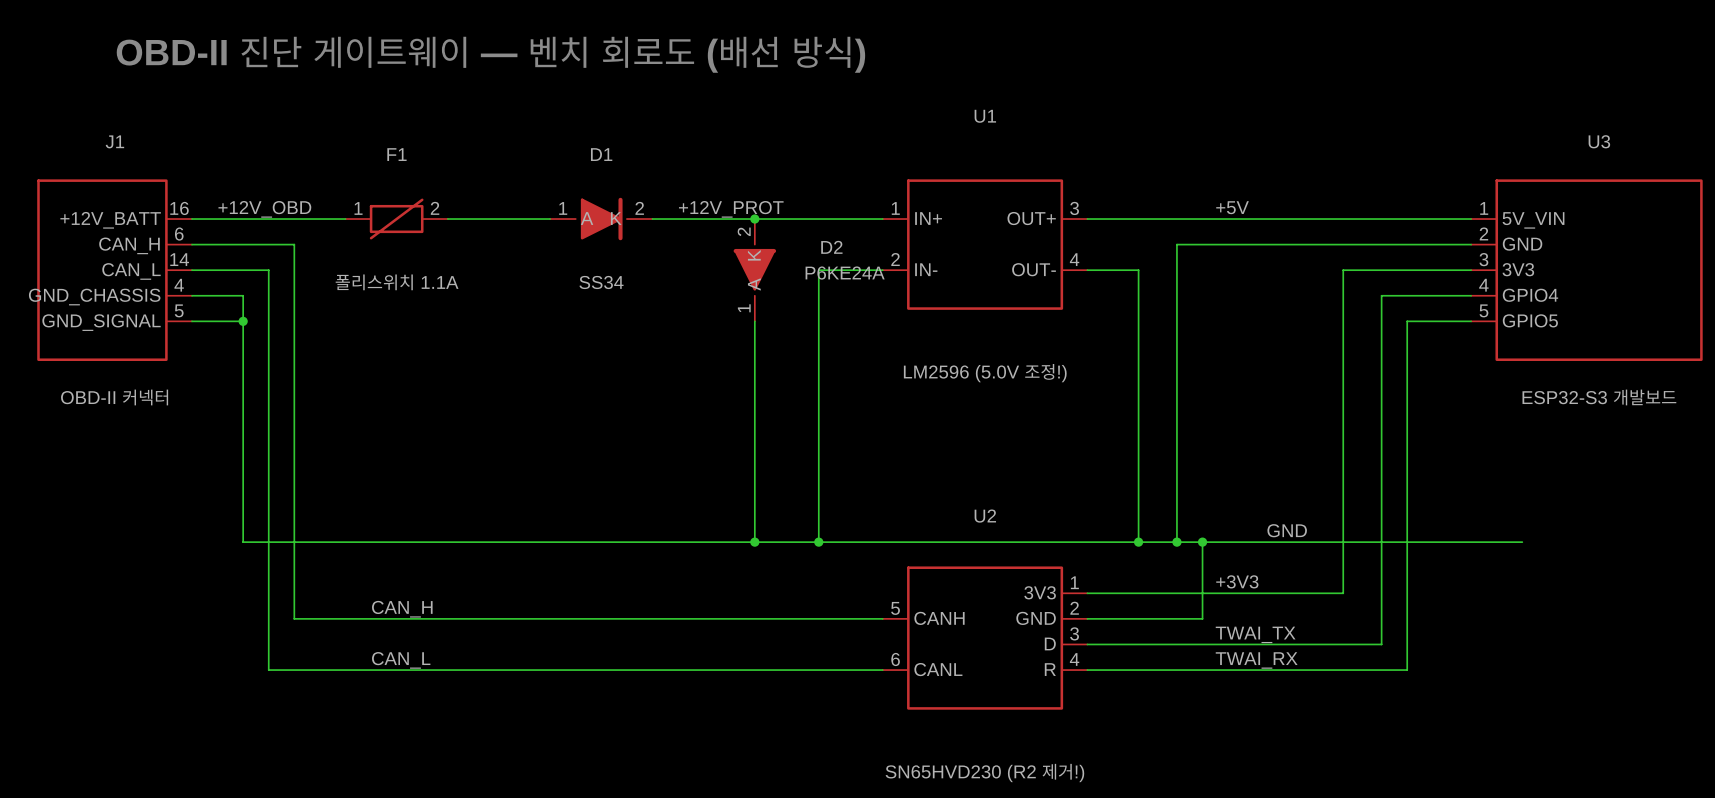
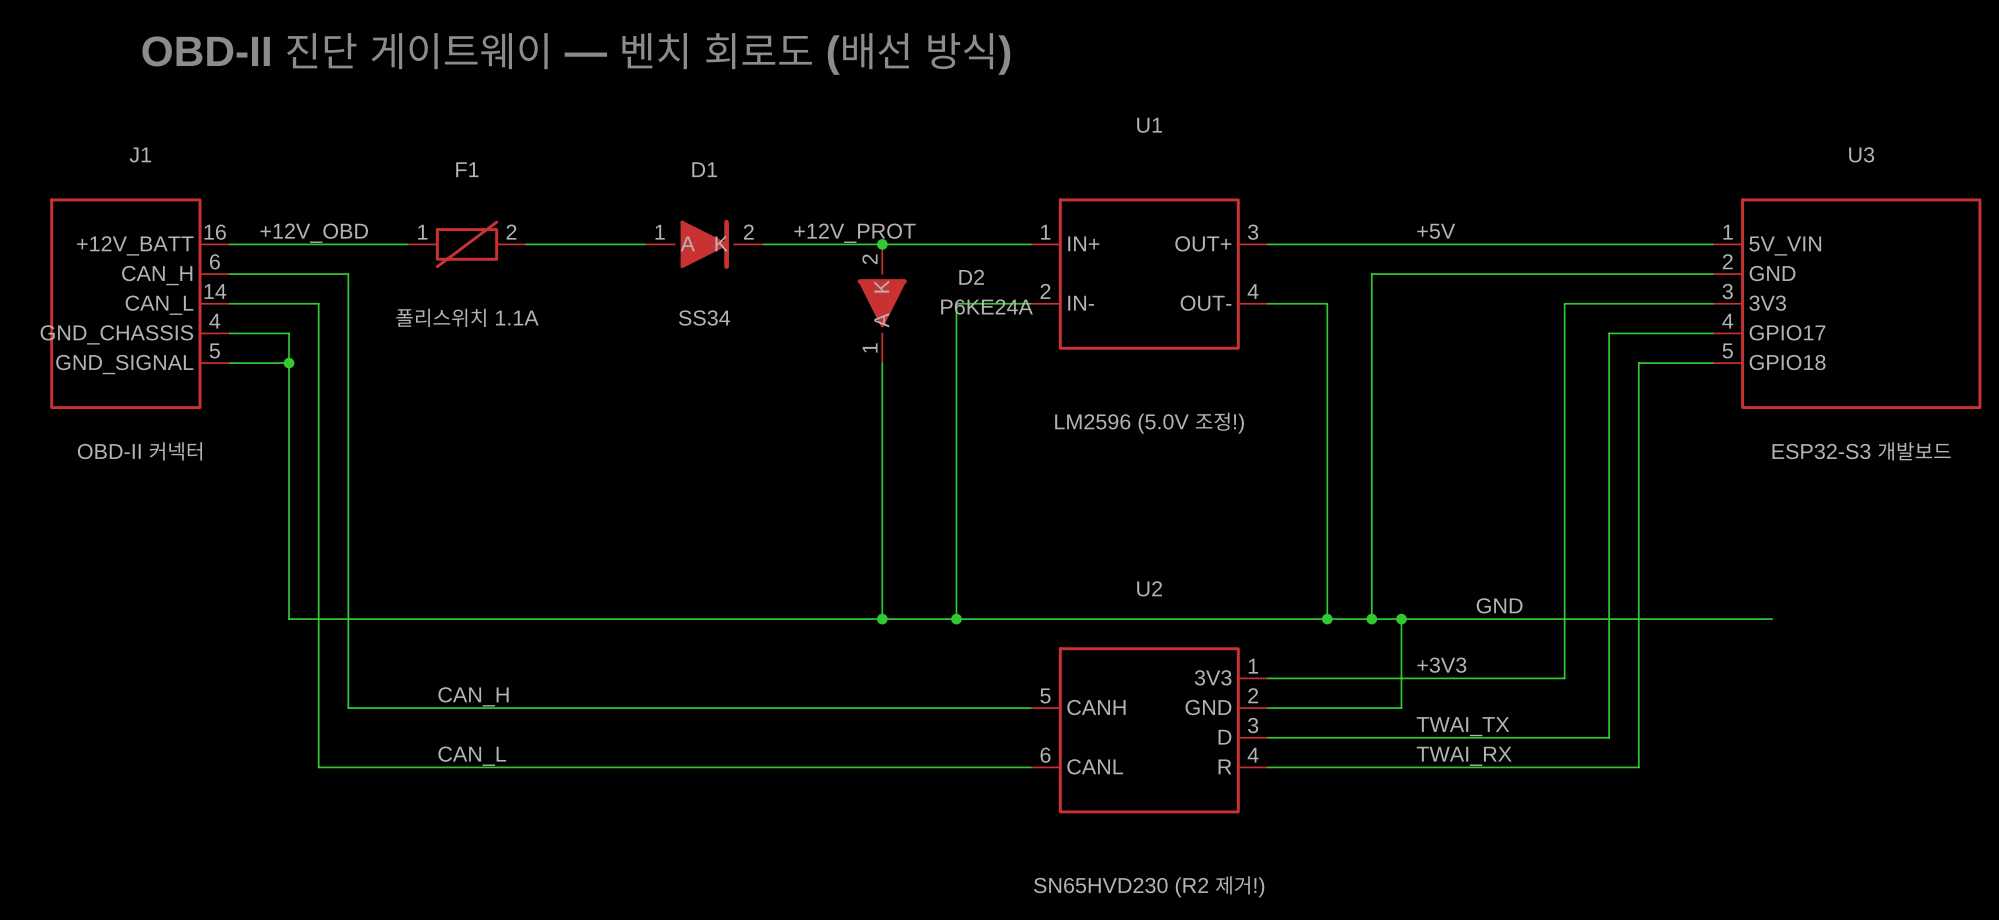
U3 pin name: GPIO4 (1530, 295) -> GPIO17 (1787, 332)
U3 pin name: GPIO5 (1530, 320) -> GPIO18 (1787, 362)

